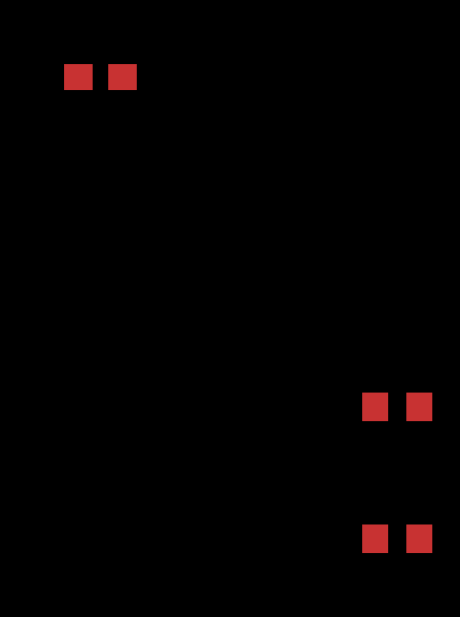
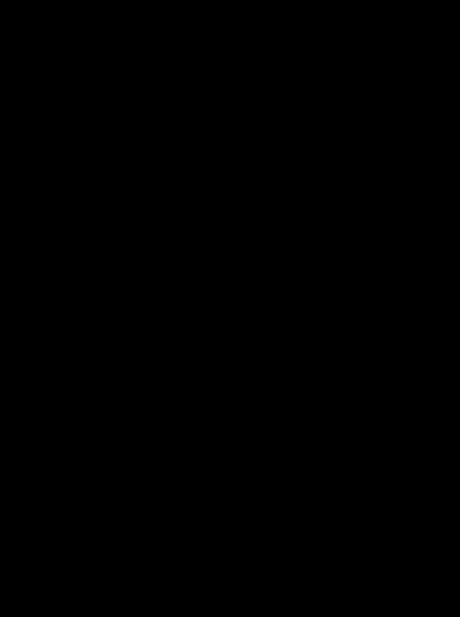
part: (100, 77) -> none
part: (397, 406) -> none
part: (397, 538) -> none

